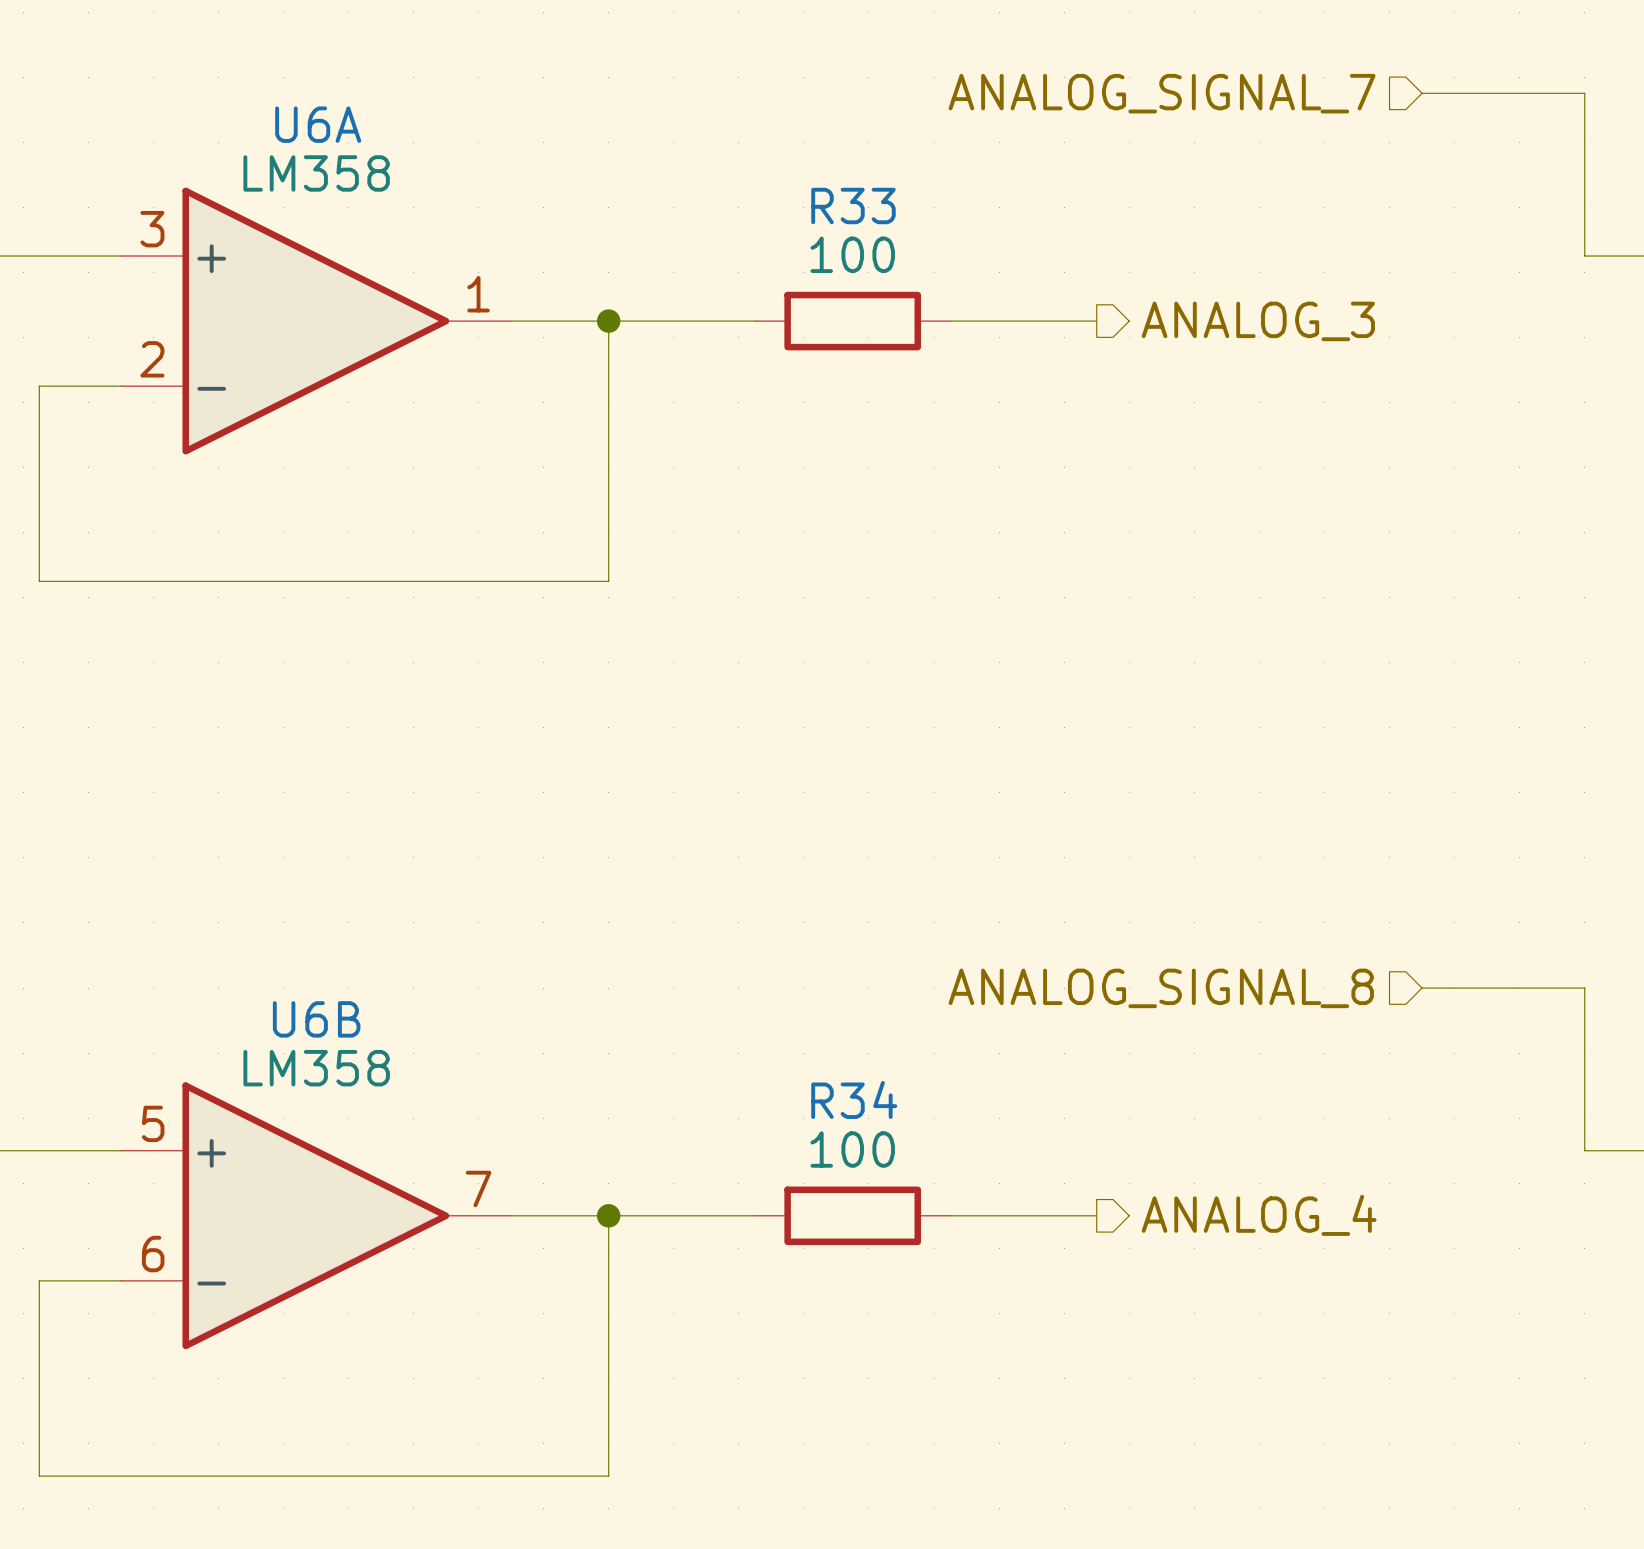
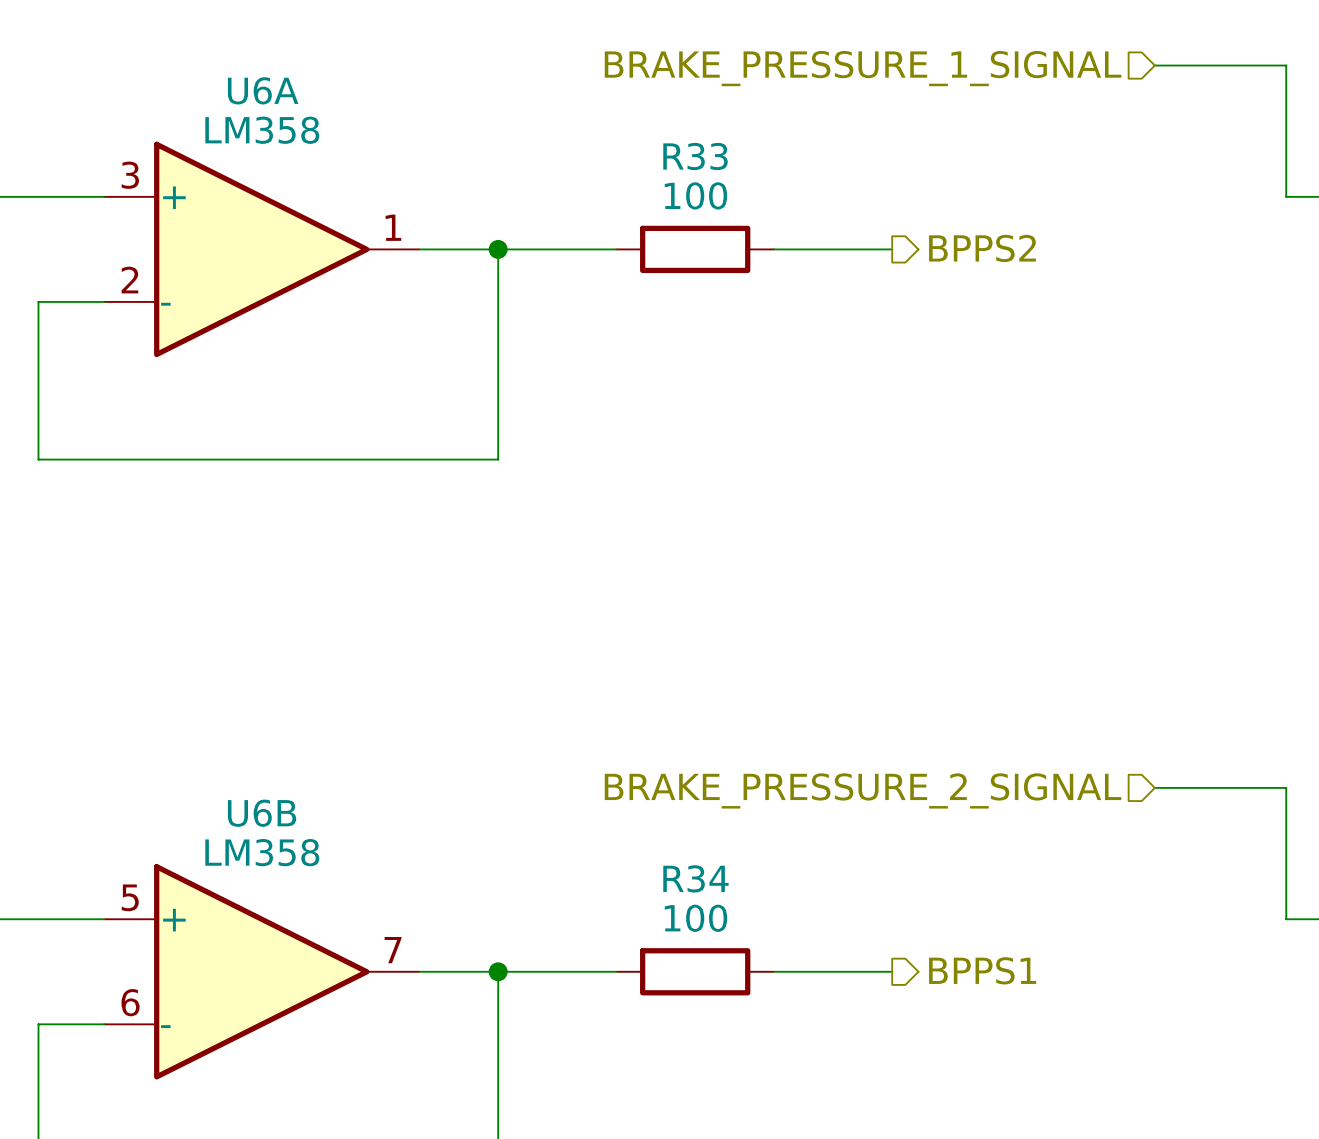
hierarchical label: ANALOG_SIGNAL_7 (1162, 93) -> BRAKE_PRESSURE_1_SIGNAL (863, 68)
hierarchical label: ANALOG_3 (1258, 321) -> BPPS2 (982, 248)
hierarchical label: ANALOG_SIGNAL_8 (1161, 988) -> BRAKE_PRESSURE_2_SIGNAL (863, 790)
hierarchical label: ANALOG_4 (1259, 1215) -> BPPS1 (982, 970)

